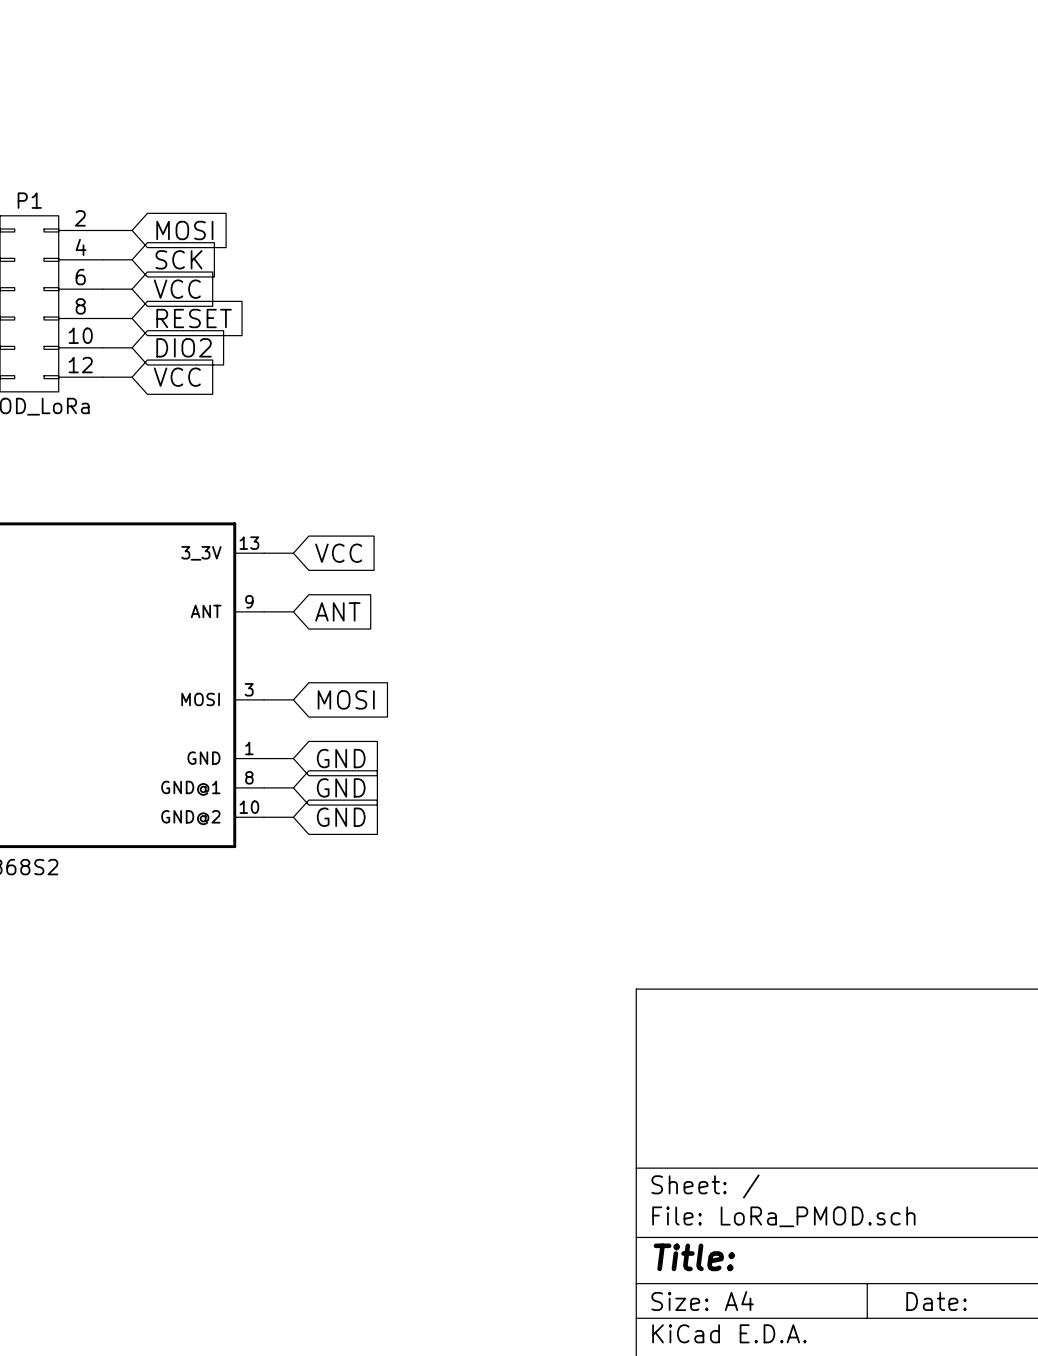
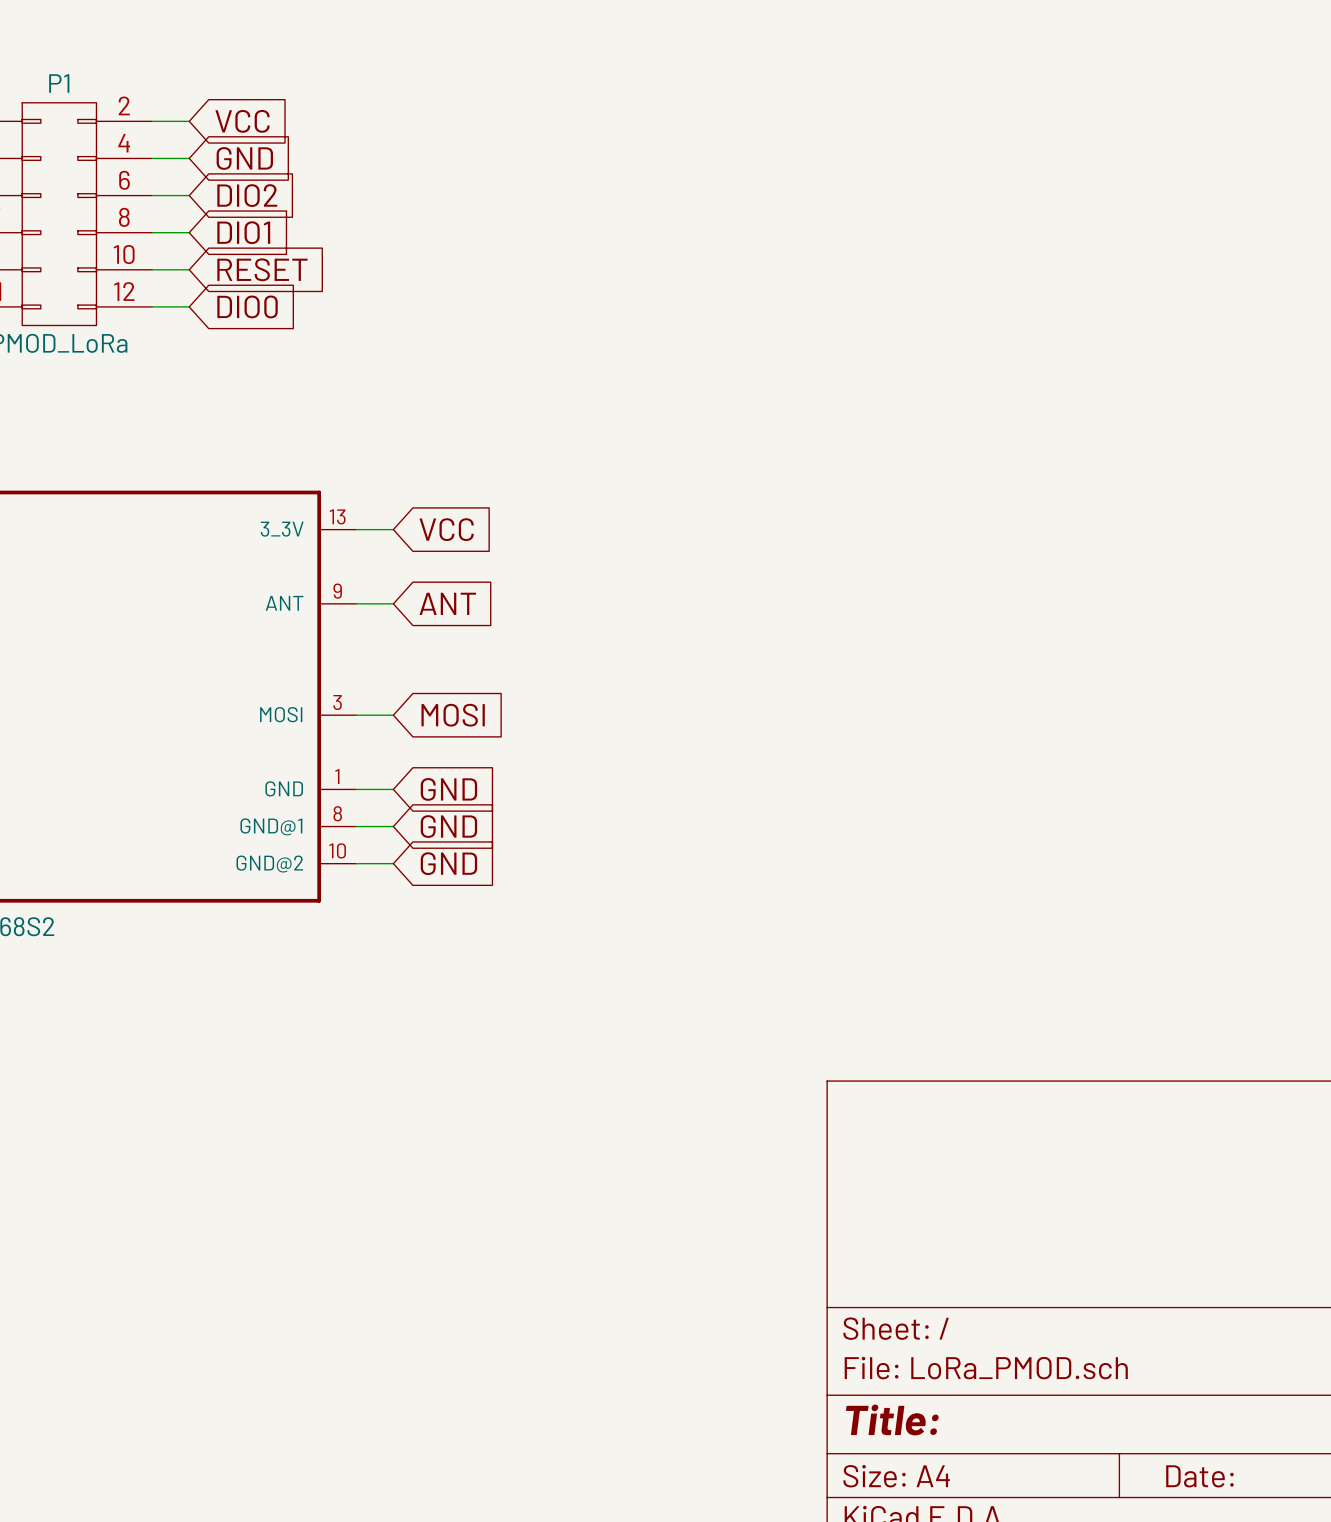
global label: MOSI (184, 230) -> VCC (242, 121)
global label: SCK (179, 259) -> GND (244, 158)
global label: VCC (177, 289) -> DIO2 (247, 195)
global label: RESET (194, 318) -> DIO1 (243, 232)
global label: DIO2 (184, 347) -> RESET (262, 269)
global label: VCC (177, 377) -> DIO0 (247, 306)

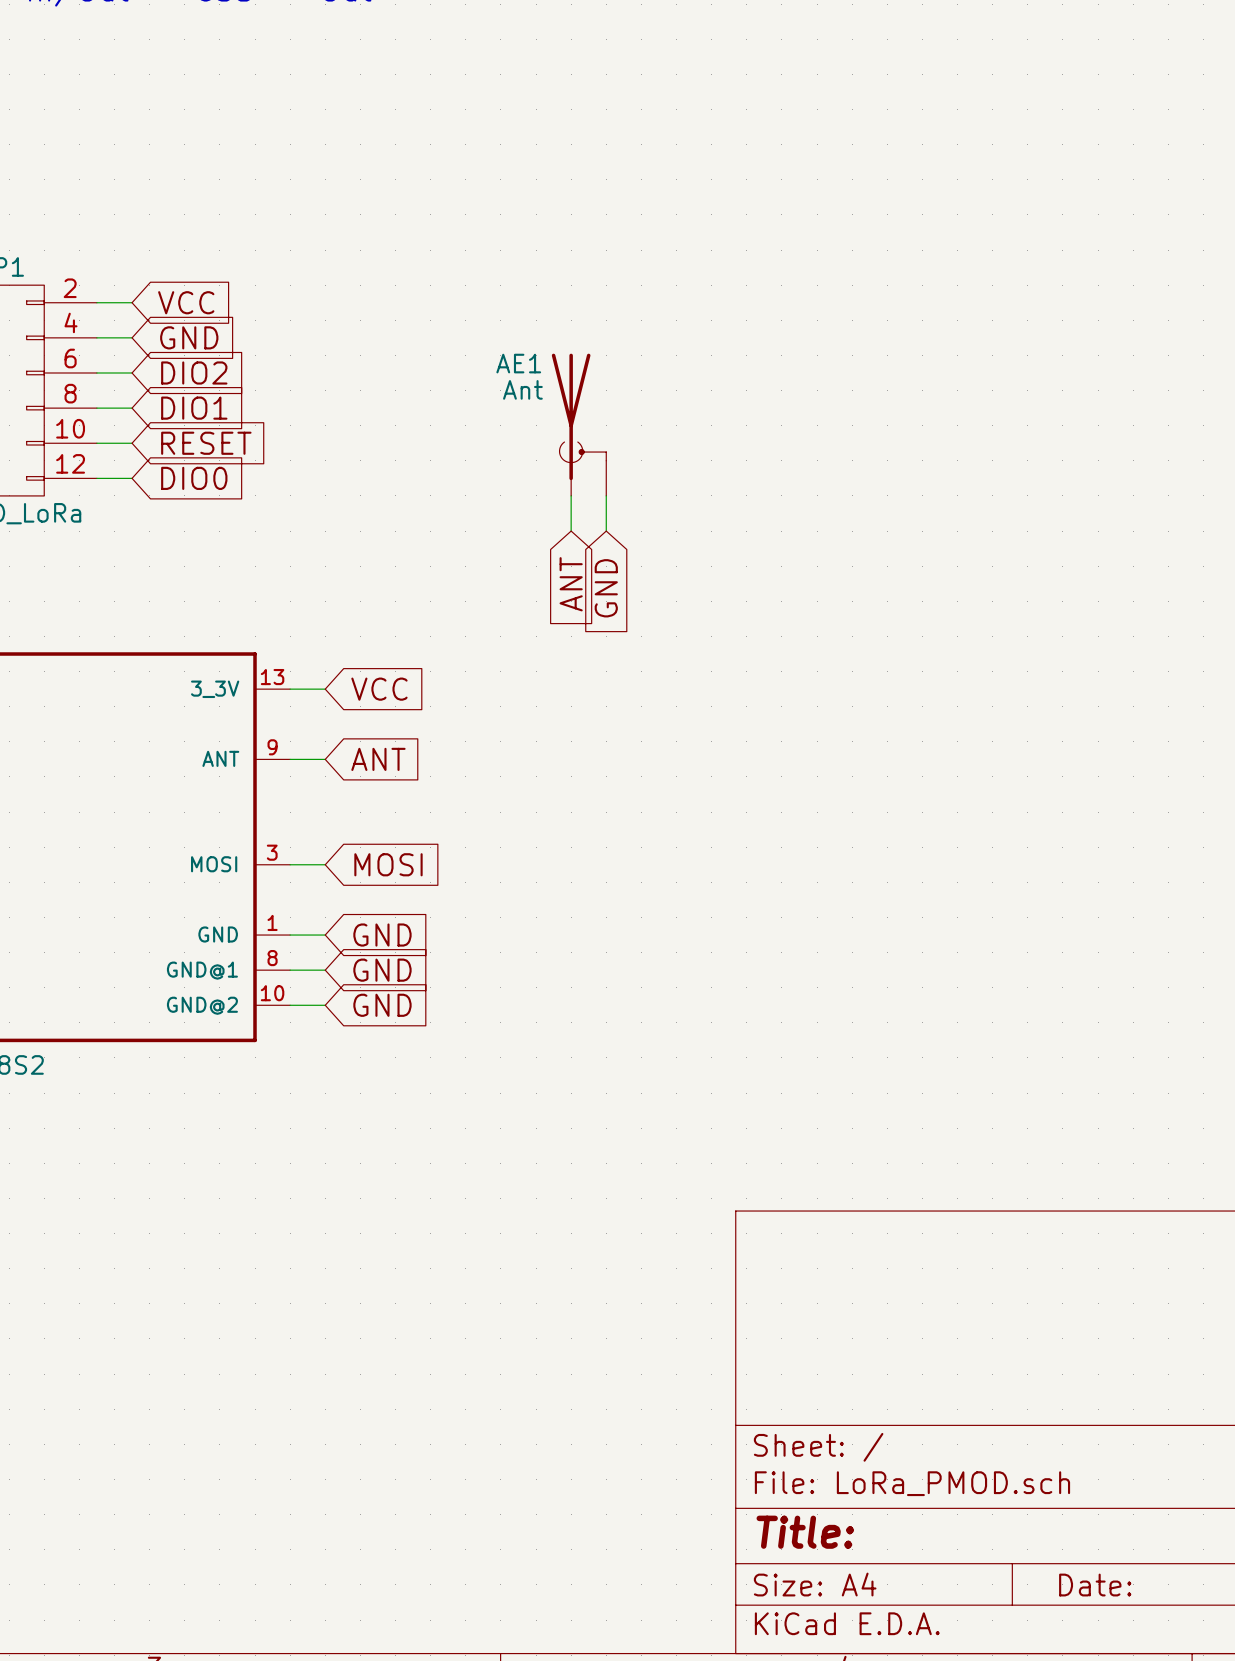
AE1: none -> Ant (579, 424)
wire: none -> (571, 495) (571, 531)
wire: none -> (606, 495) (606, 531)
global label: none -> ANT (571, 584)
global label: none -> GND (606, 588)

